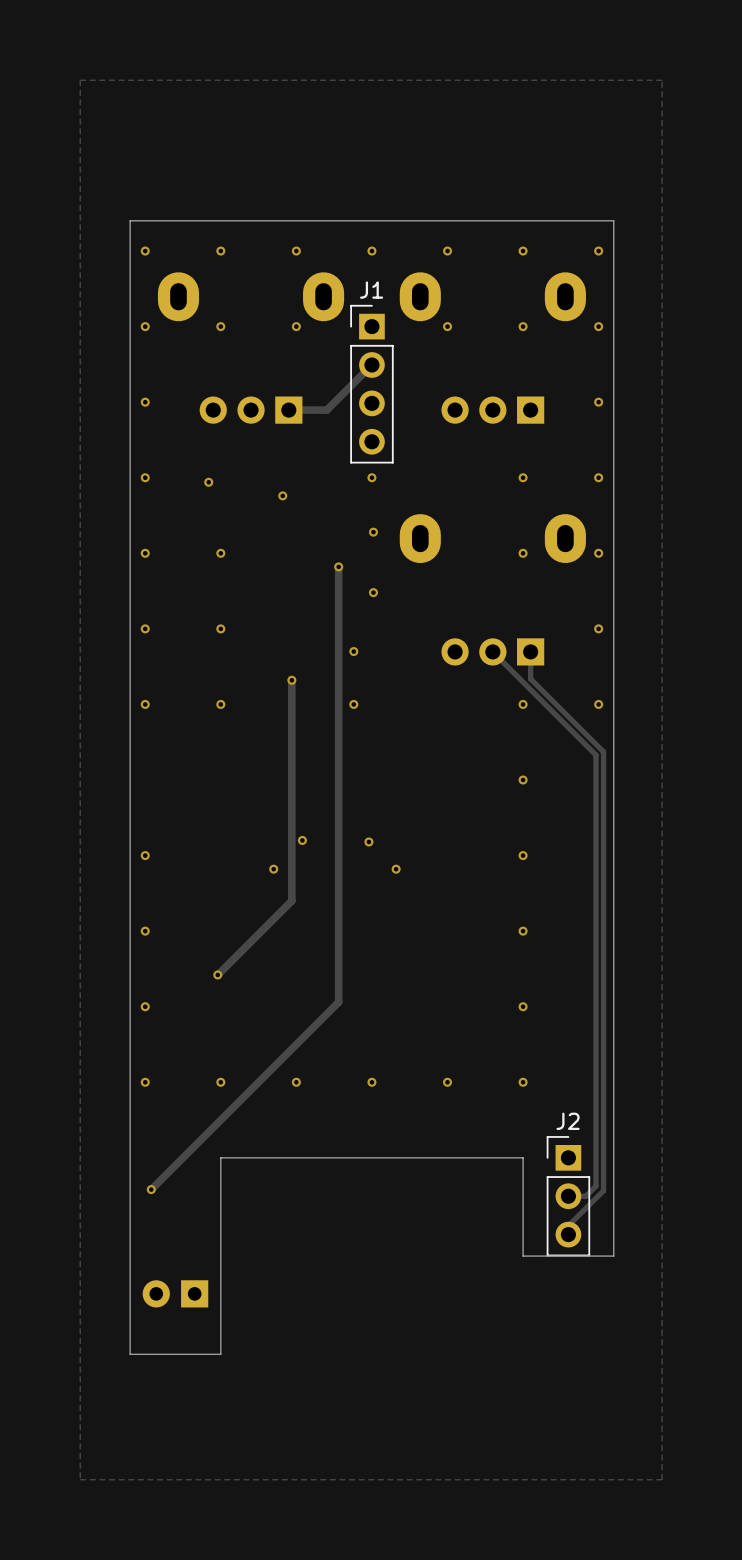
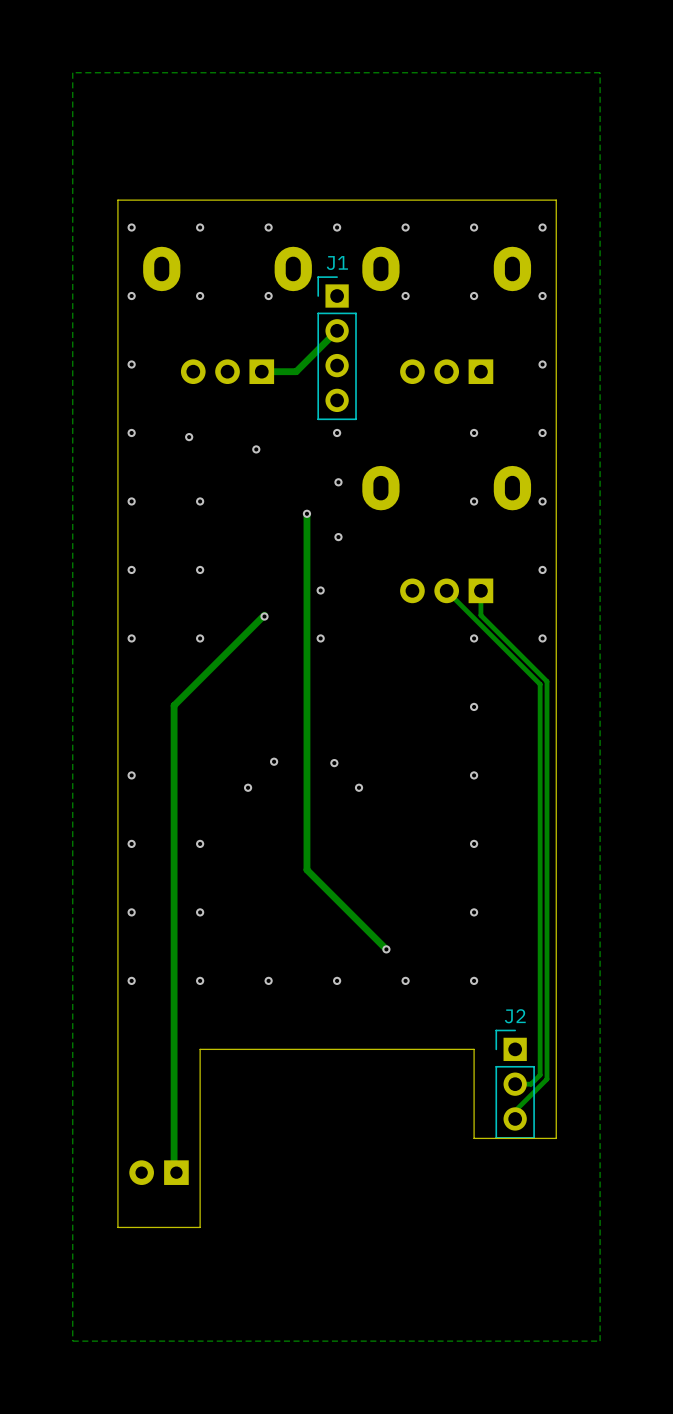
track: none -> (264, 615) (174, 705) (174, 1172)
track: (291, 680) (291, 900) (217, 974) -> none
via: none -> (200, 843)
track: (338, 959) (338, 1002) (151, 1189) -> (306, 869) (386, 949)
via: (217, 974) -> none
via: none -> (200, 912)
via: none -> (386, 949)
via: (151, 1189) -> none

